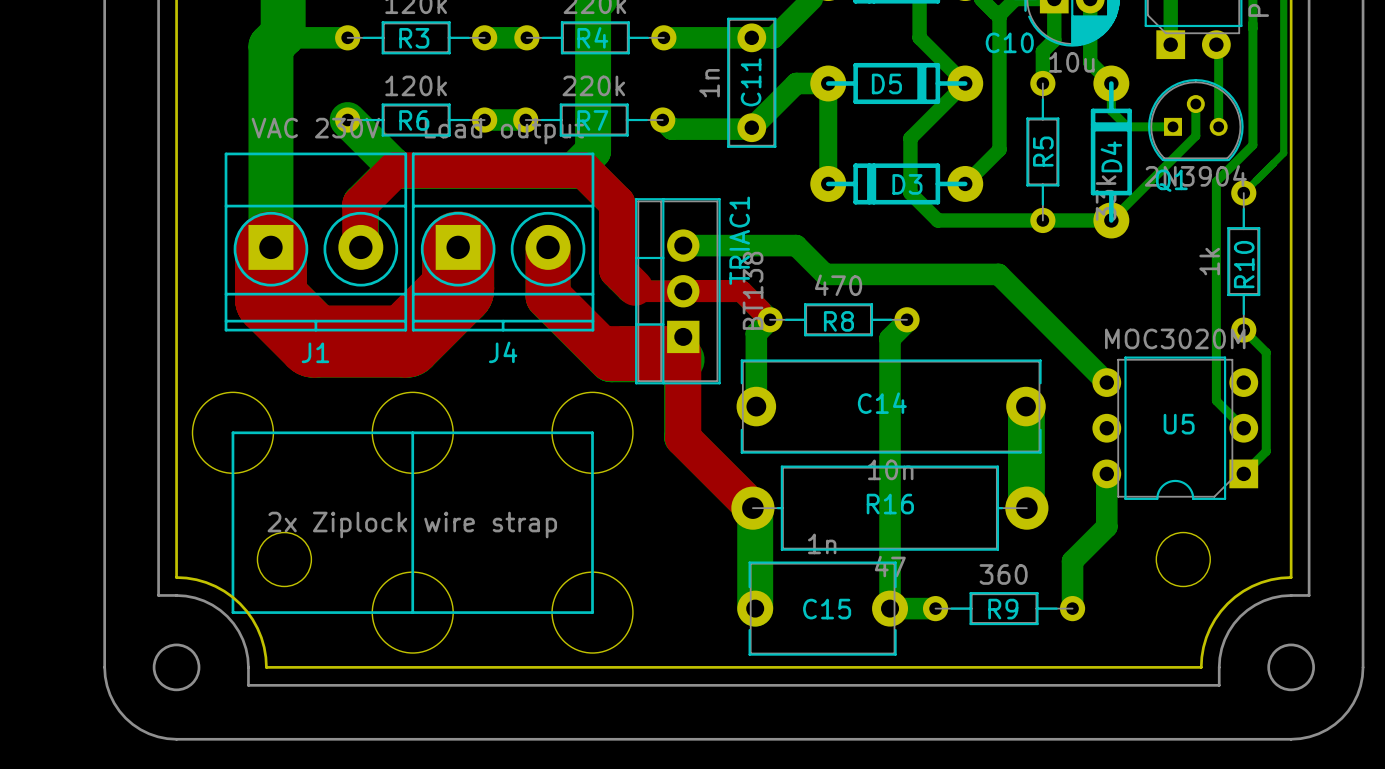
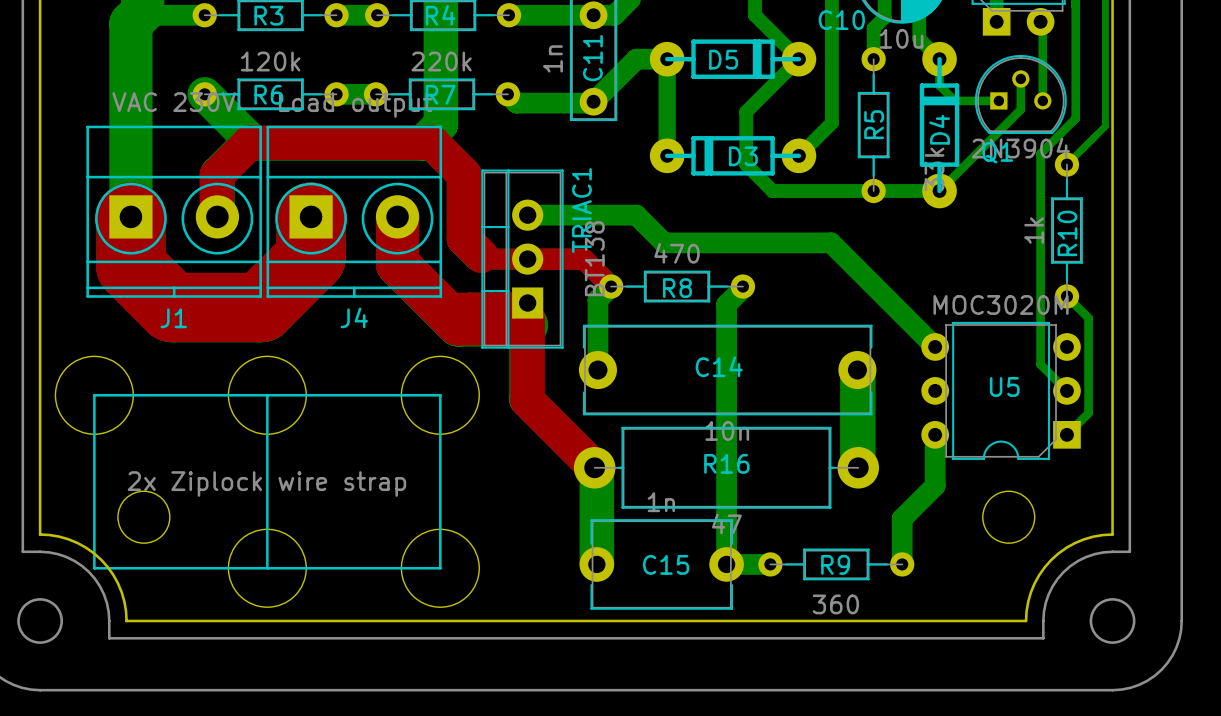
R9 value position: 360 (1003, 574) -> 360 (835, 604)

